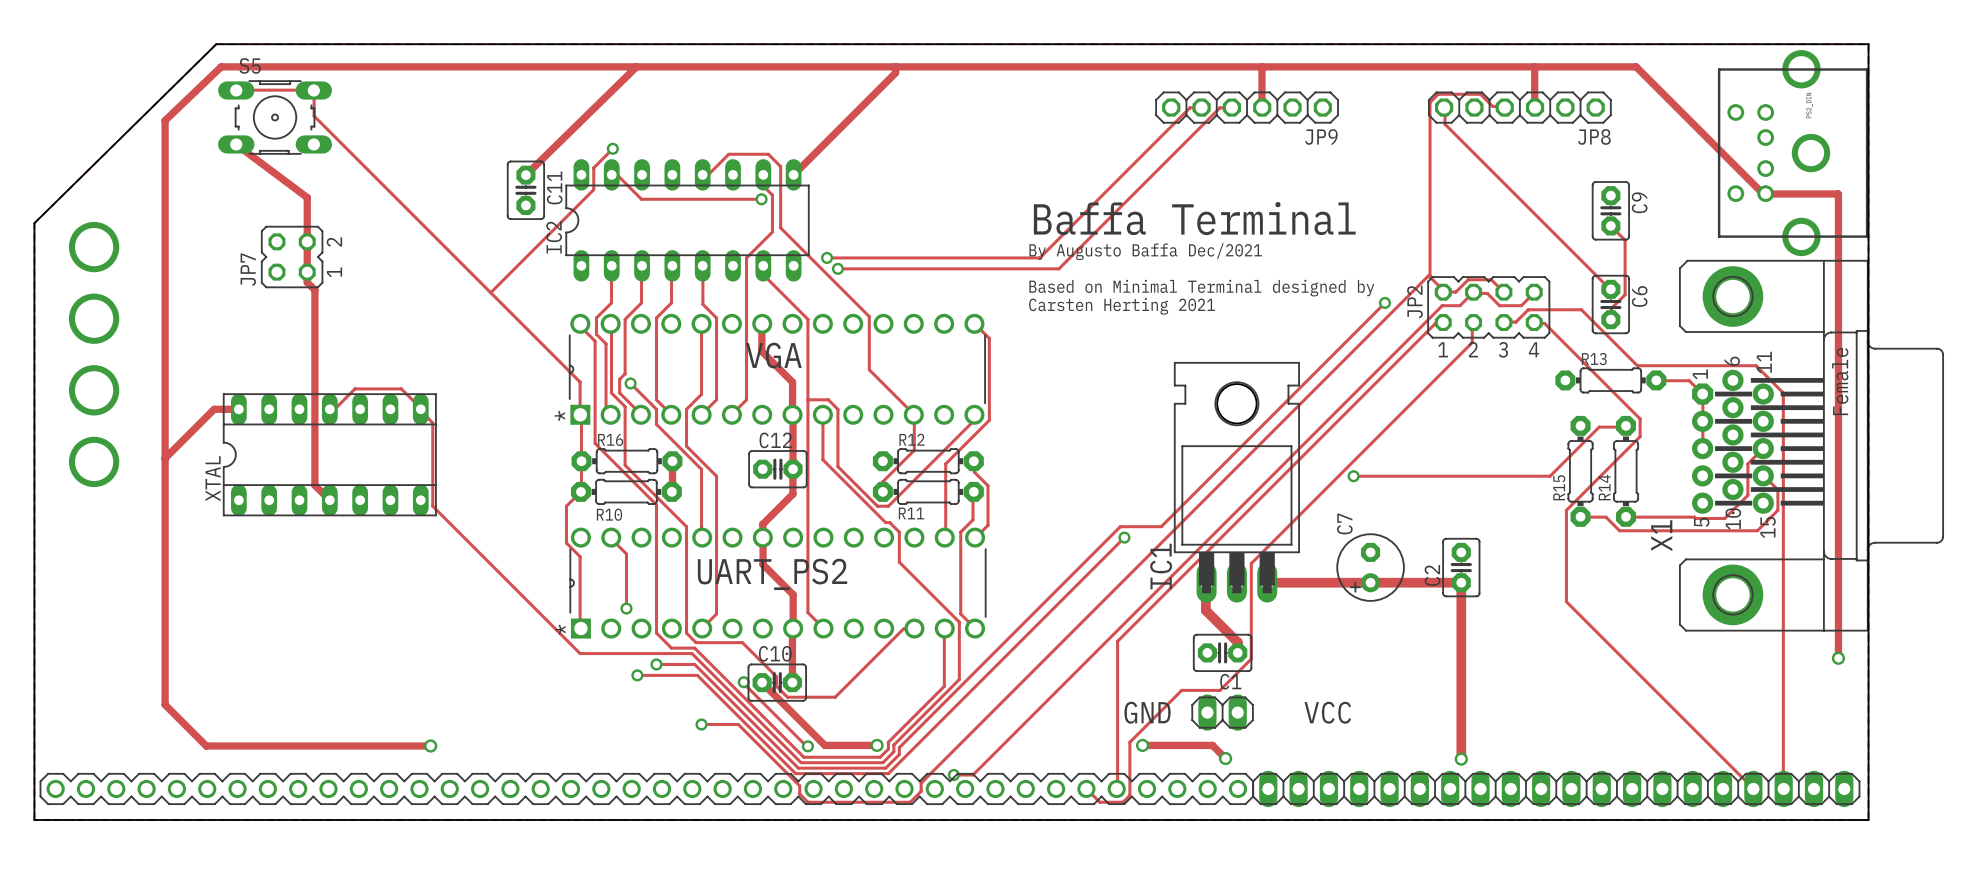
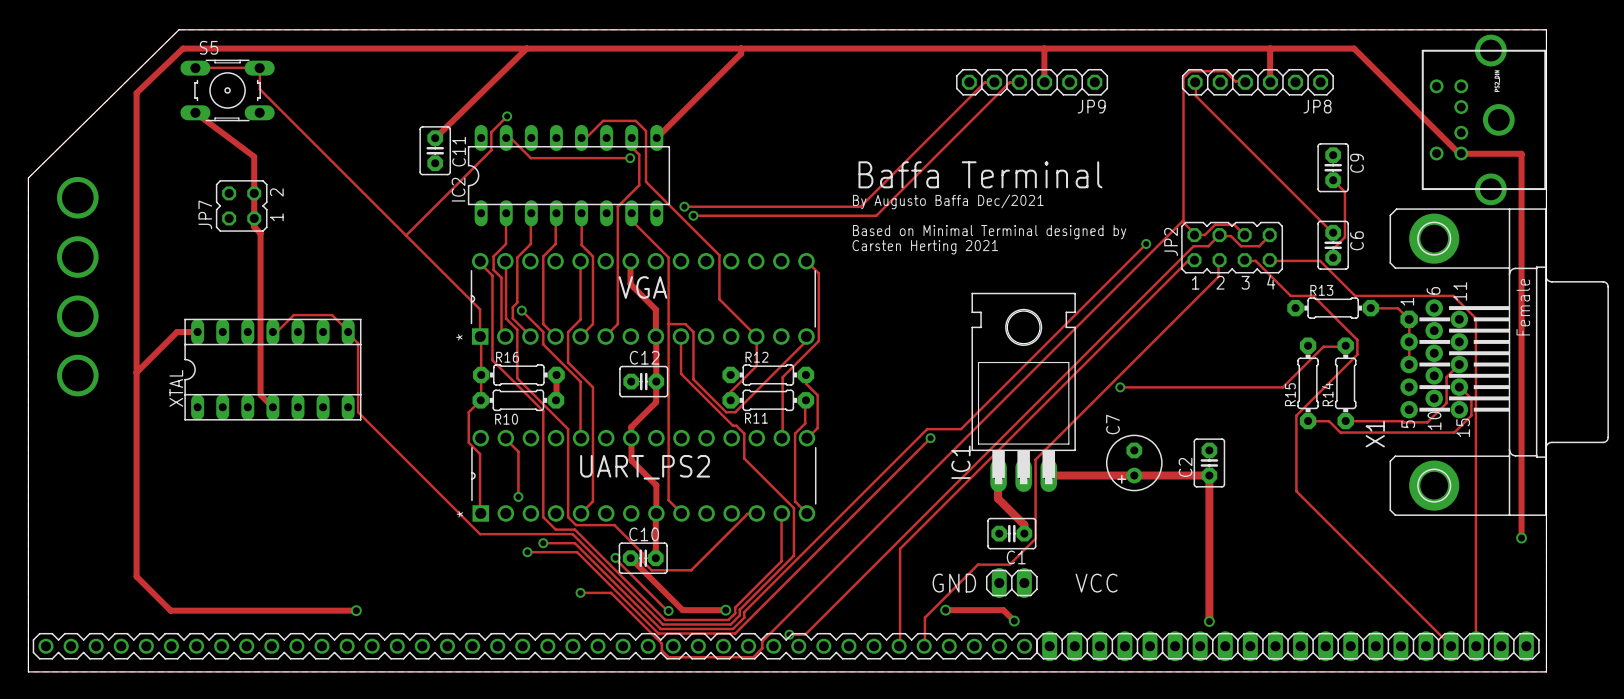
track: (1503, 322) (1515, 322) (1528, 309) (1581, 309) (1595, 323) -> (1278, 260) (1320, 260)
track: (1544, 323) (1586, 365) -> (1244, 260) (1255, 260) (1290, 295) (1313, 295)
track: (1117, 641) (1117, 754) -> (924, 524) (900, 548) (899, 646)
track: (1129, 742) (1129, 795) (1123, 802) (1099, 802) (1086, 788) -> (935, 607) (924, 617)

